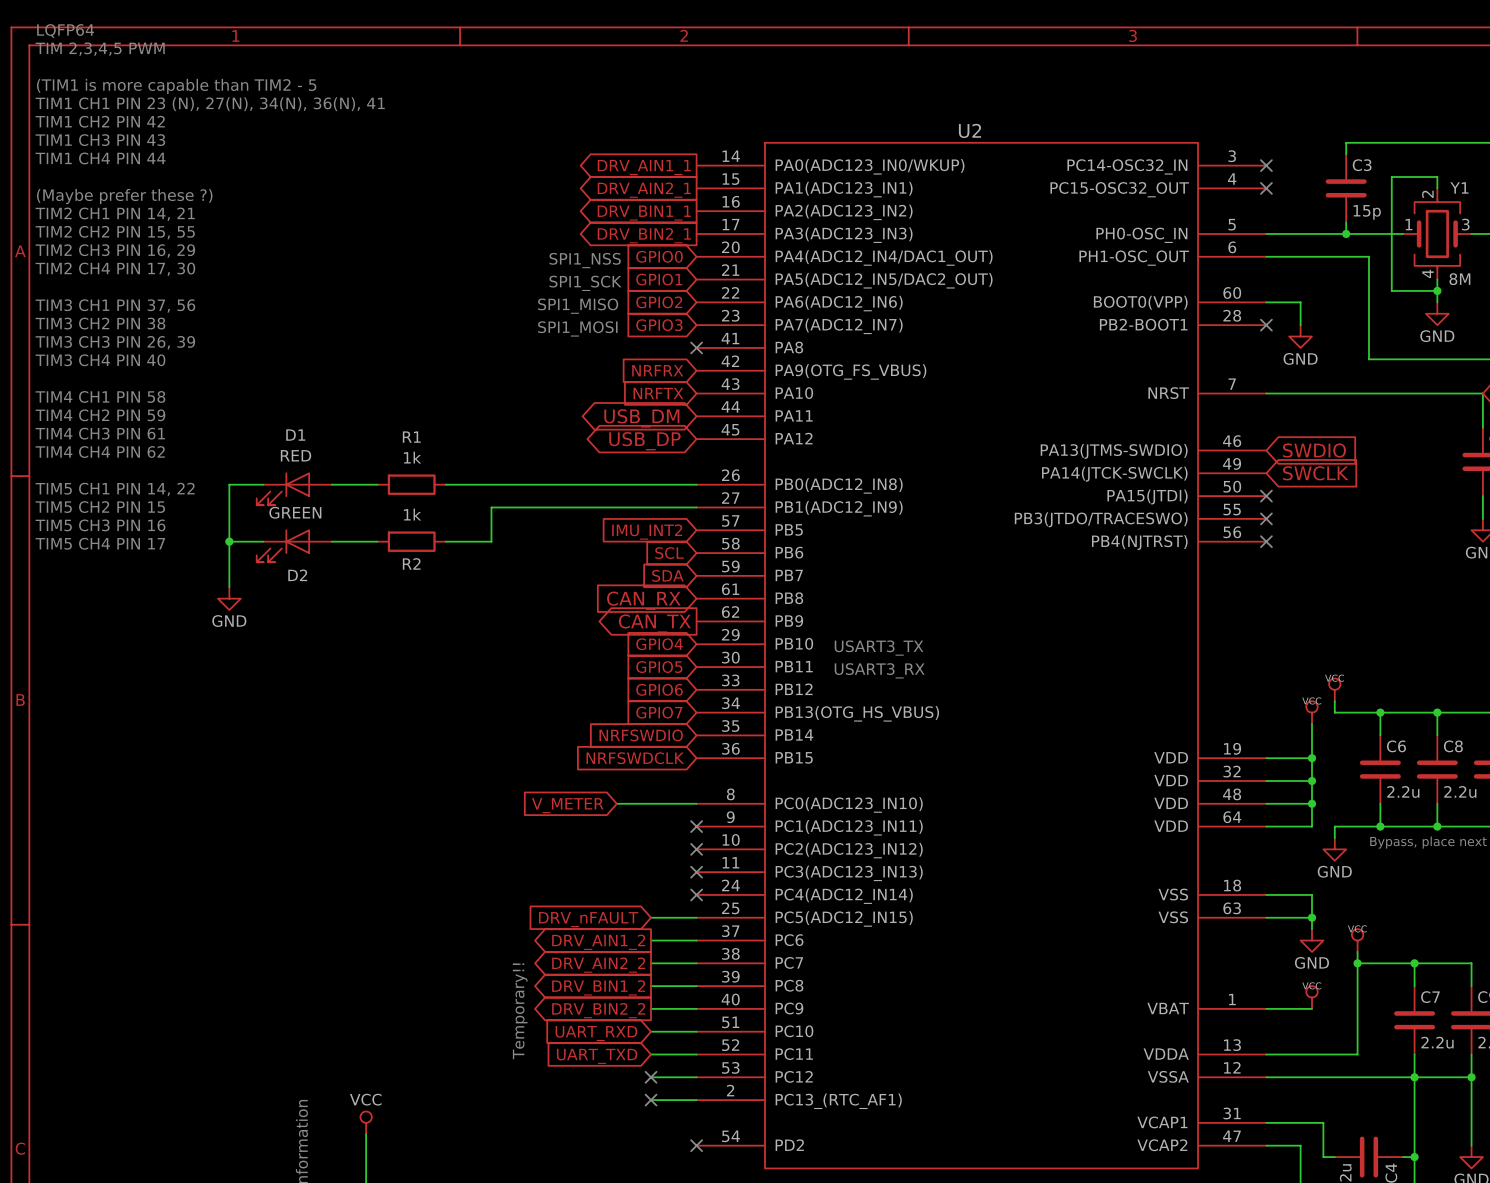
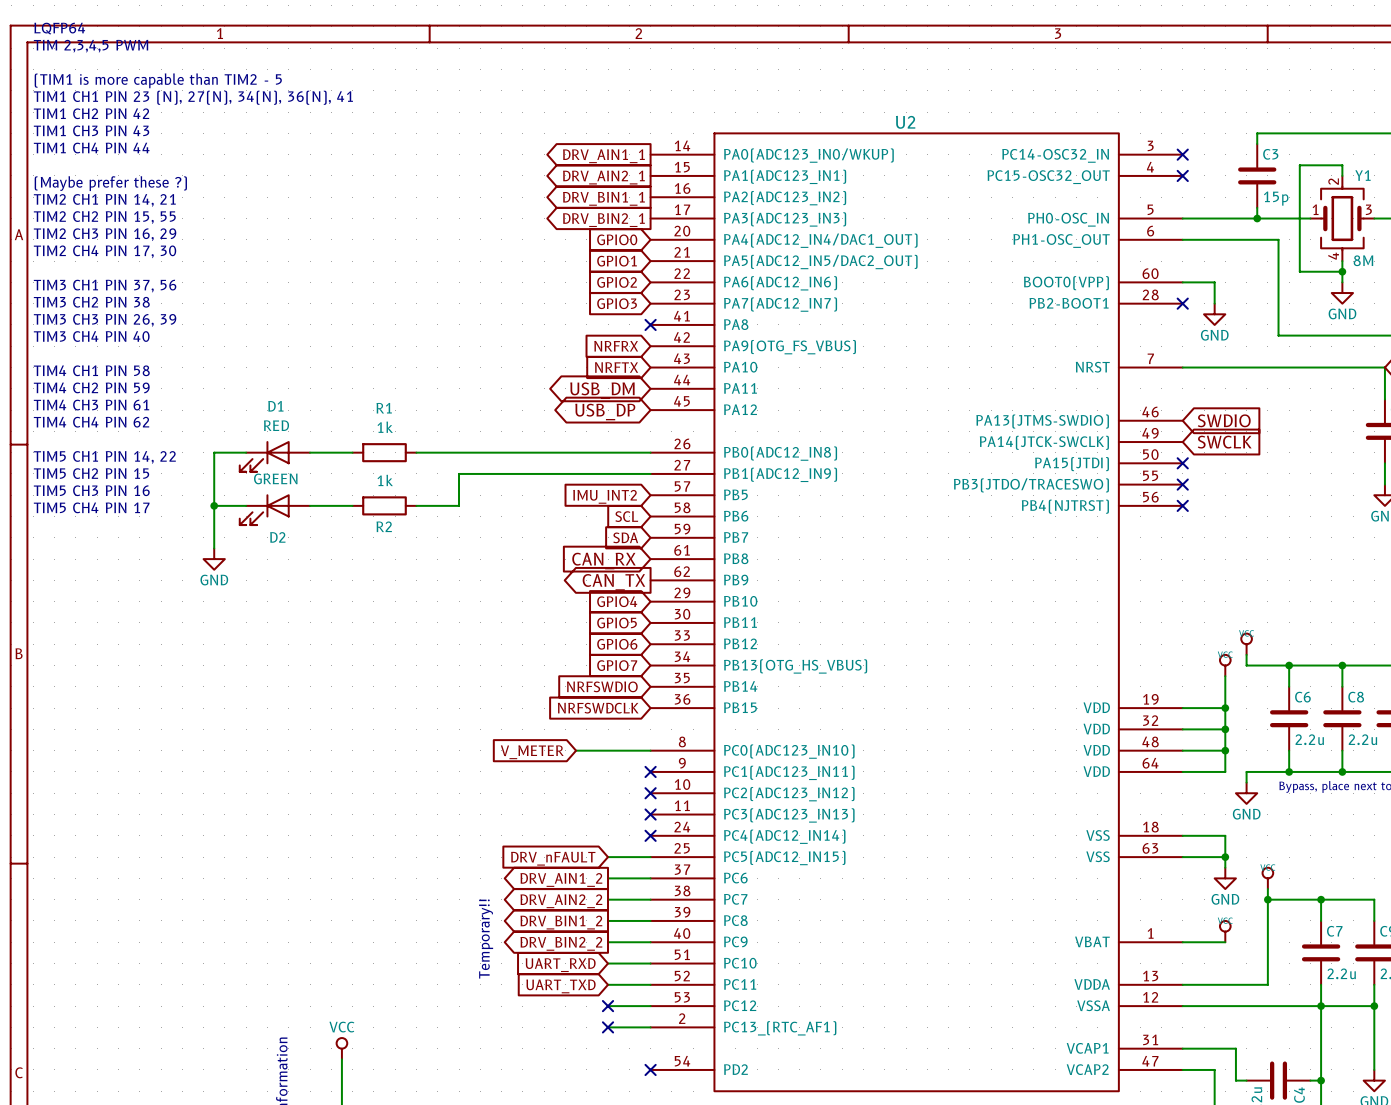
text: SPI1_NSS (585, 260) -> none
text: SPI1_SCK (585, 283) -> none
text: SPI1_MISO (578, 306) -> none
text: SPI1_MOSI (577, 328) -> none
text: USART3_TX (879, 648) -> none
text: USART3_RX (879, 670) -> none

